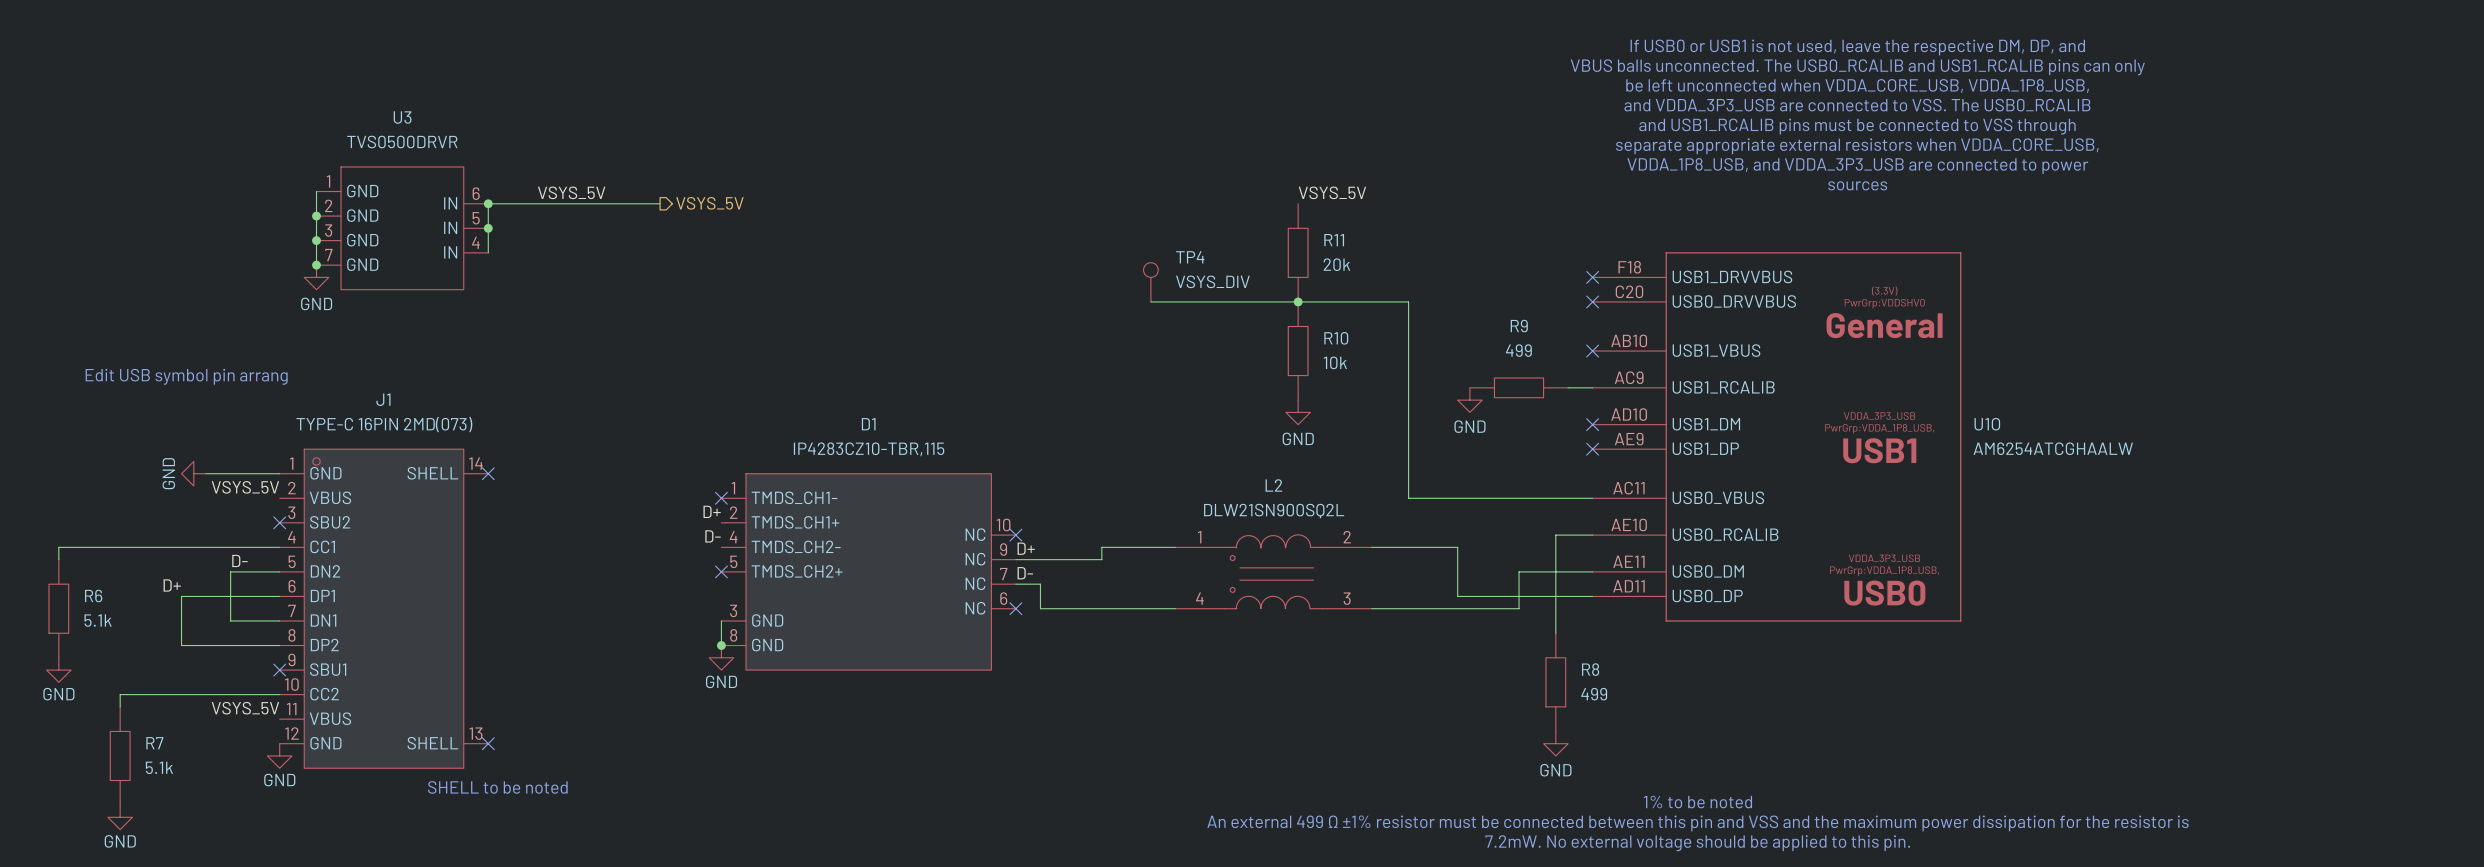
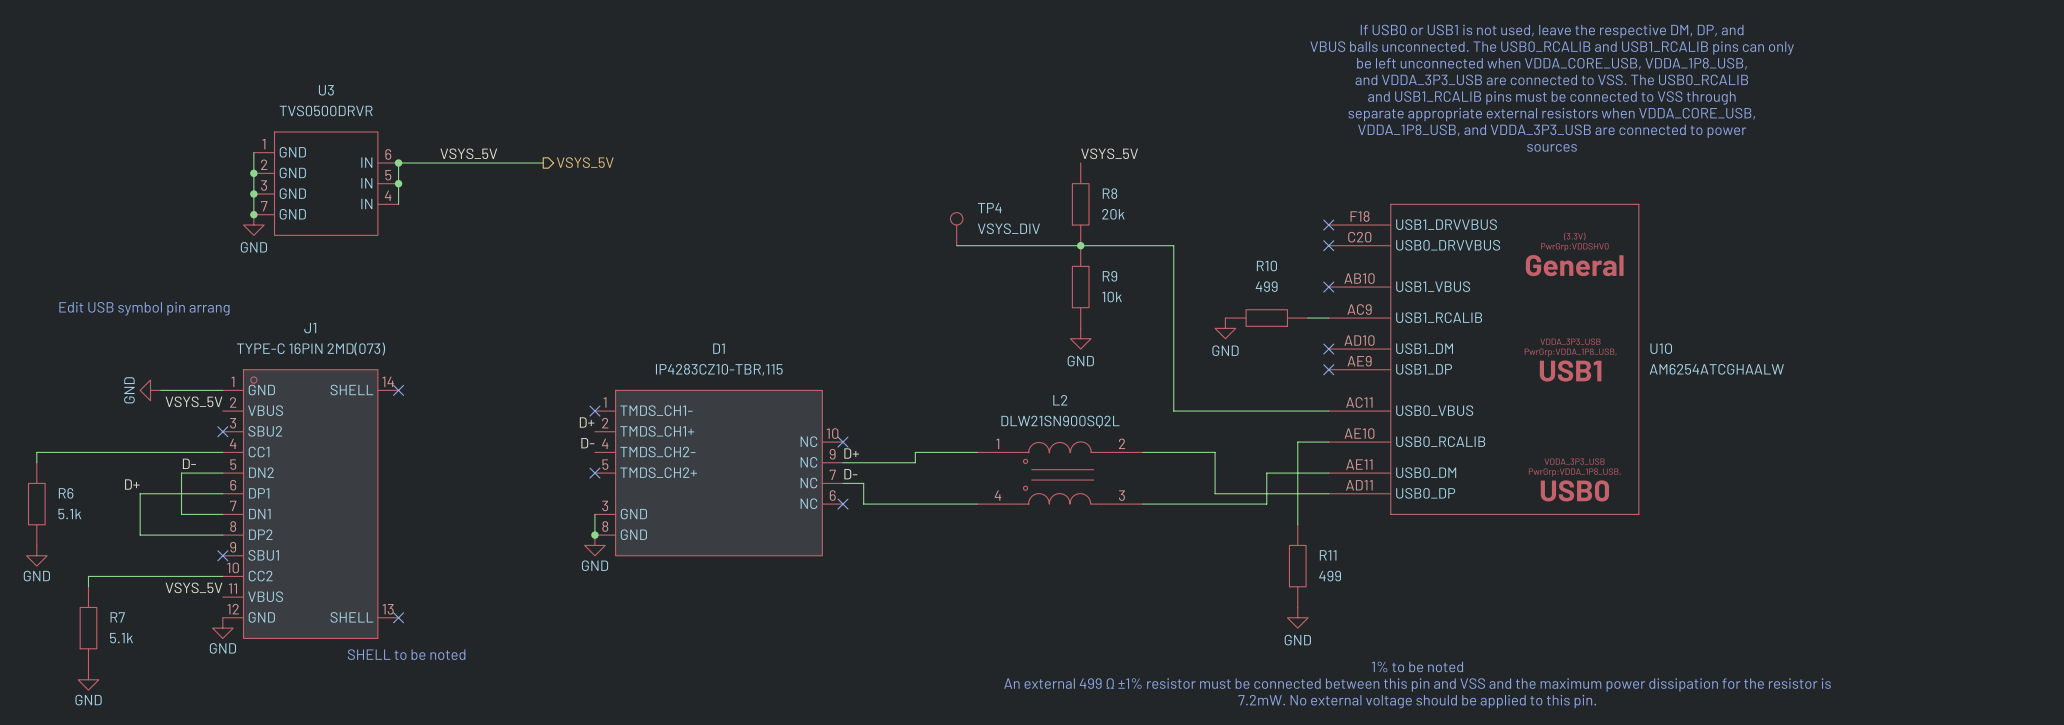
R11 name: R11 (1334, 240) -> R8 (1109, 193)
R9 name: R9 (1519, 326) -> R10 (1266, 265)
R10 name: R10 (1336, 338) -> R9 (1109, 276)
R8 name: R8 (1590, 669) -> R11 (1328, 555)

